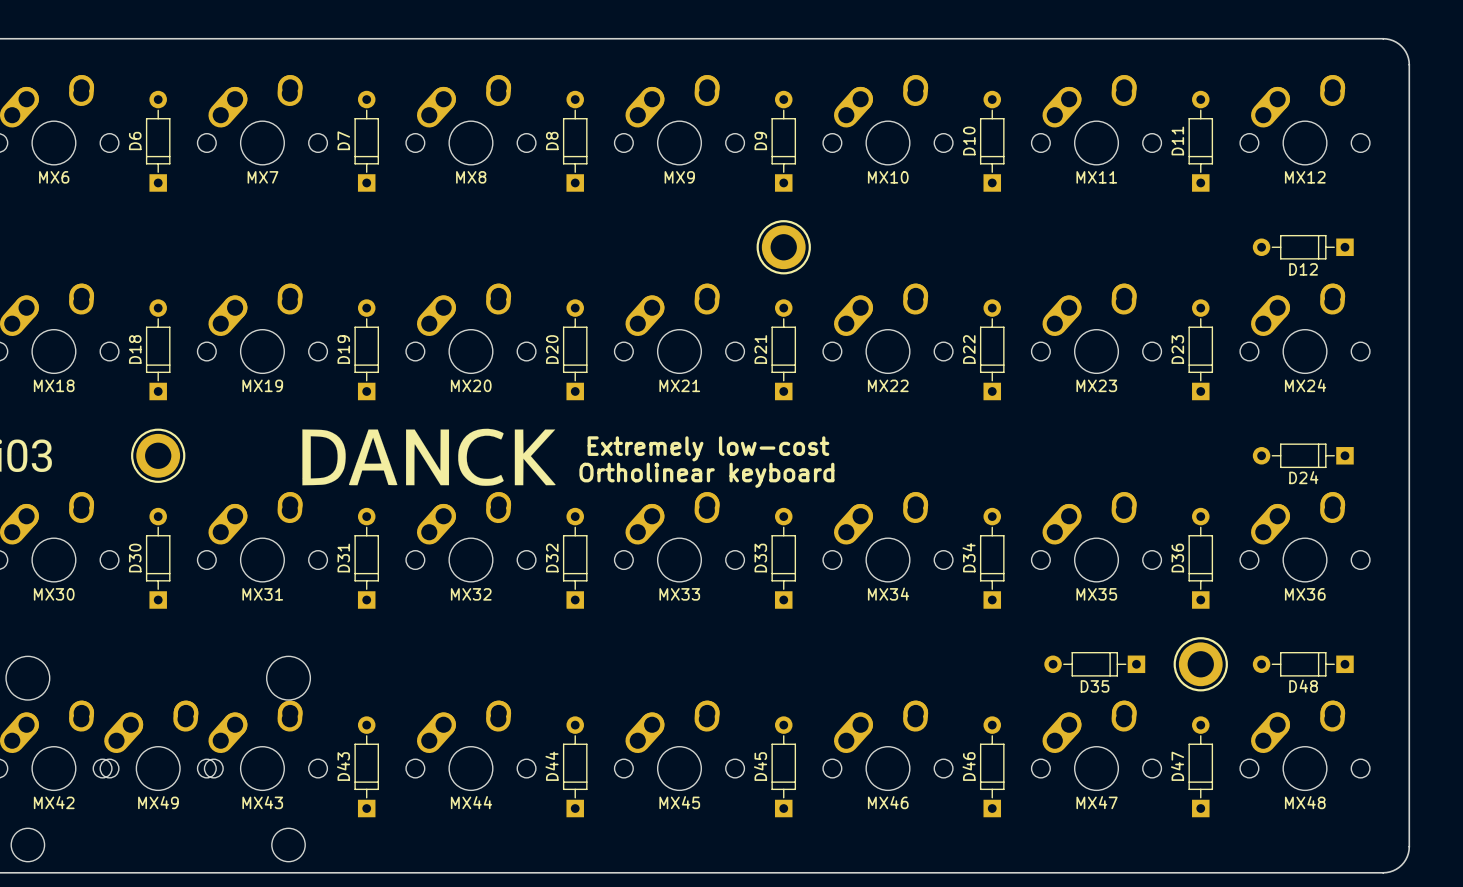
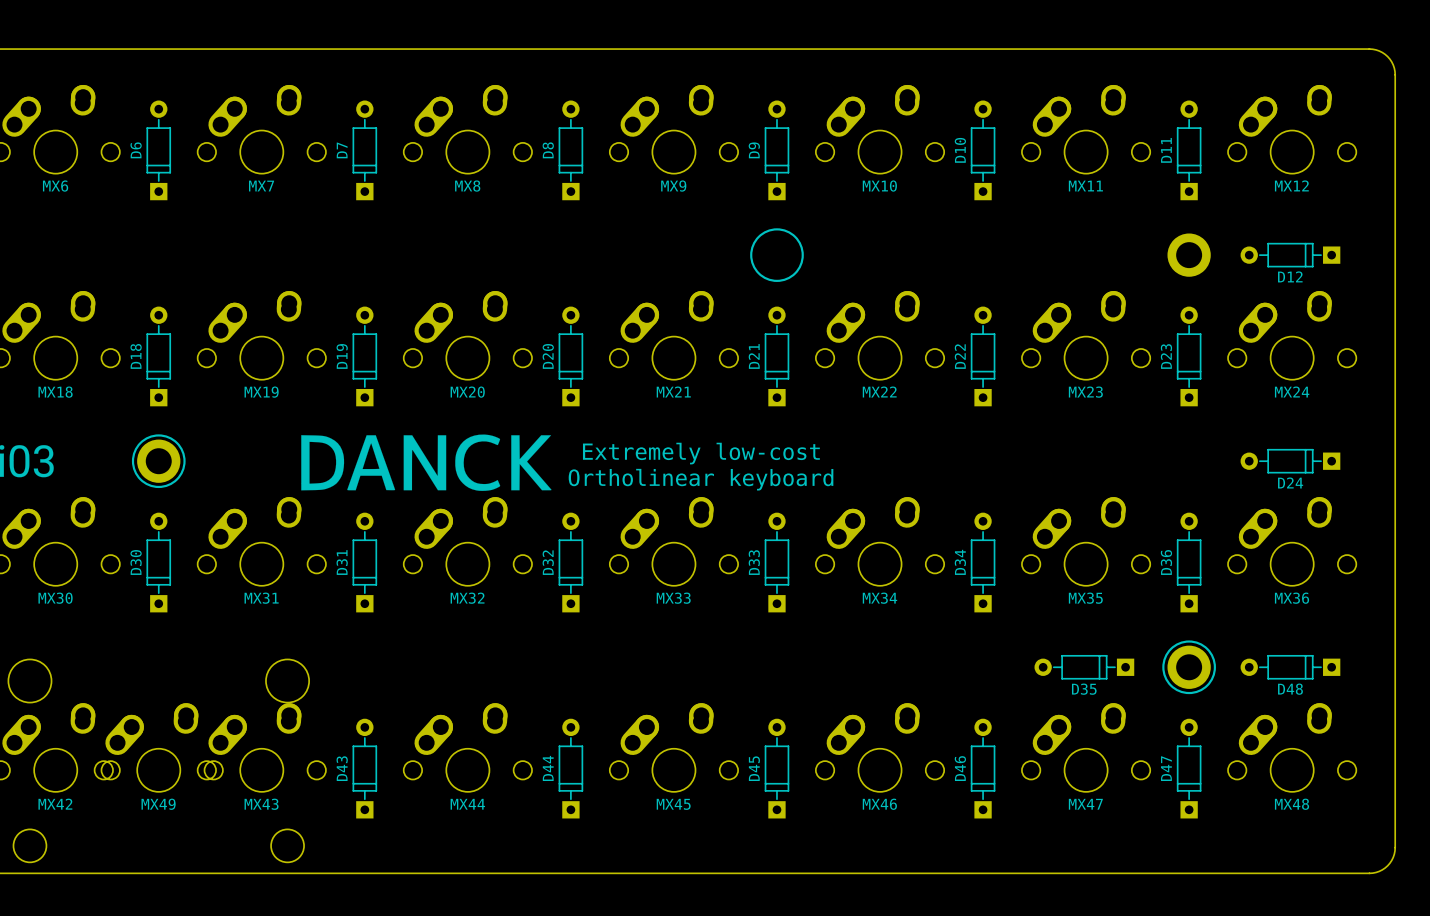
part: (783, 247) -> none
part: none -> (1189, 255)

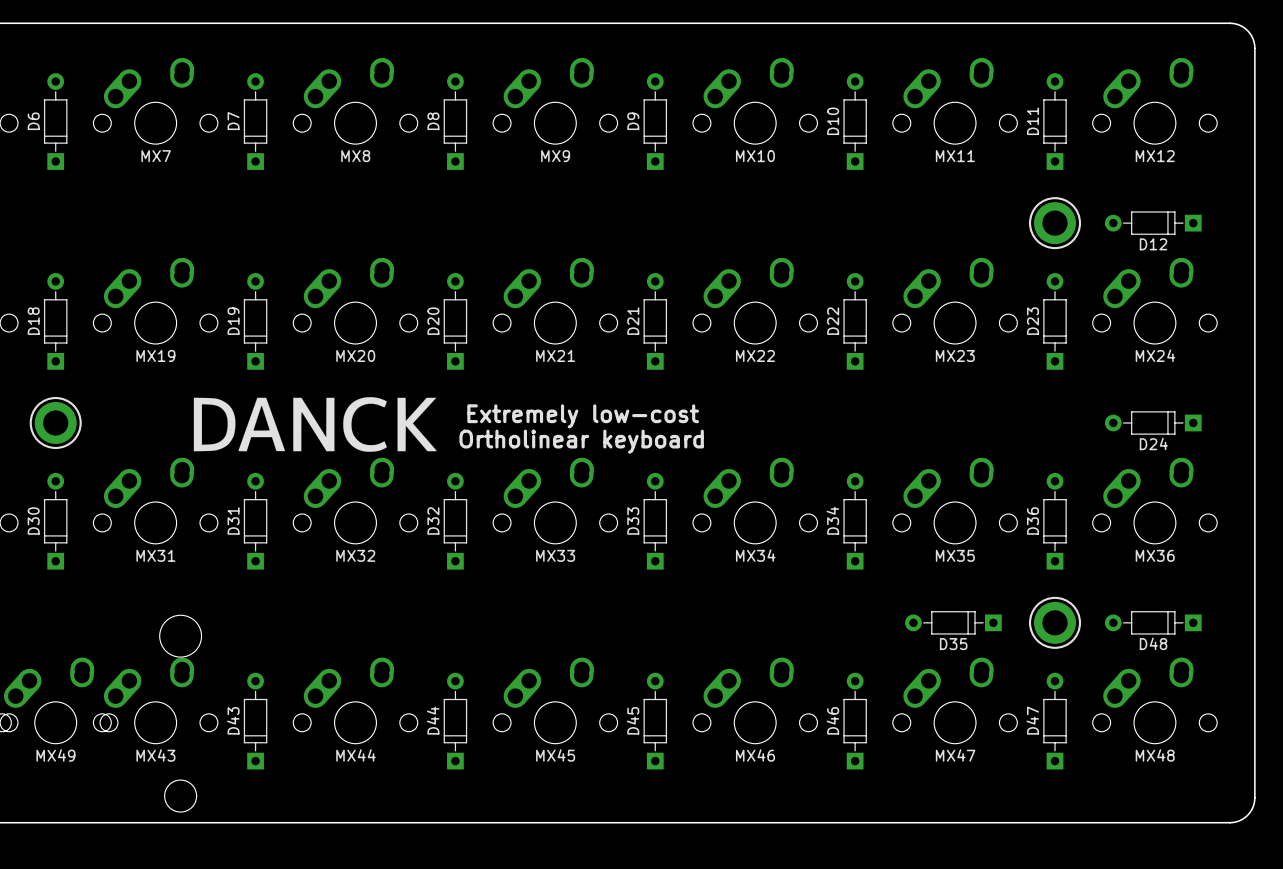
drawing: [750, 228, 804, 282] -> none
drawing: none -> [1028, 197, 1082, 250]

